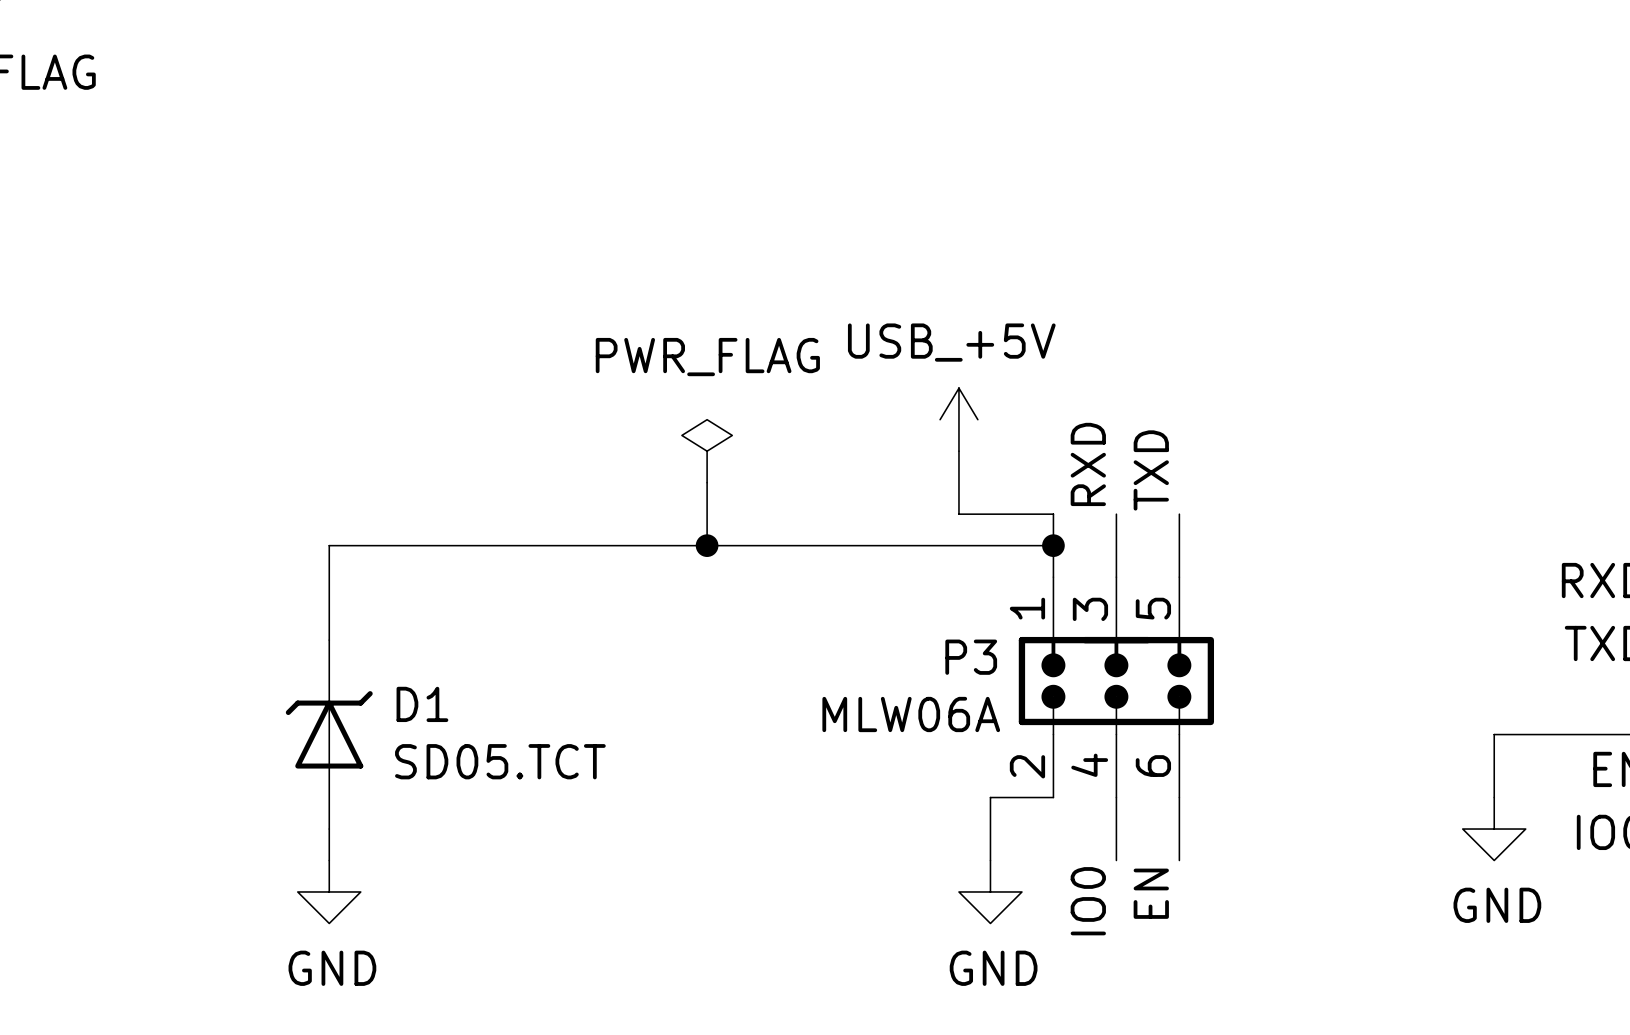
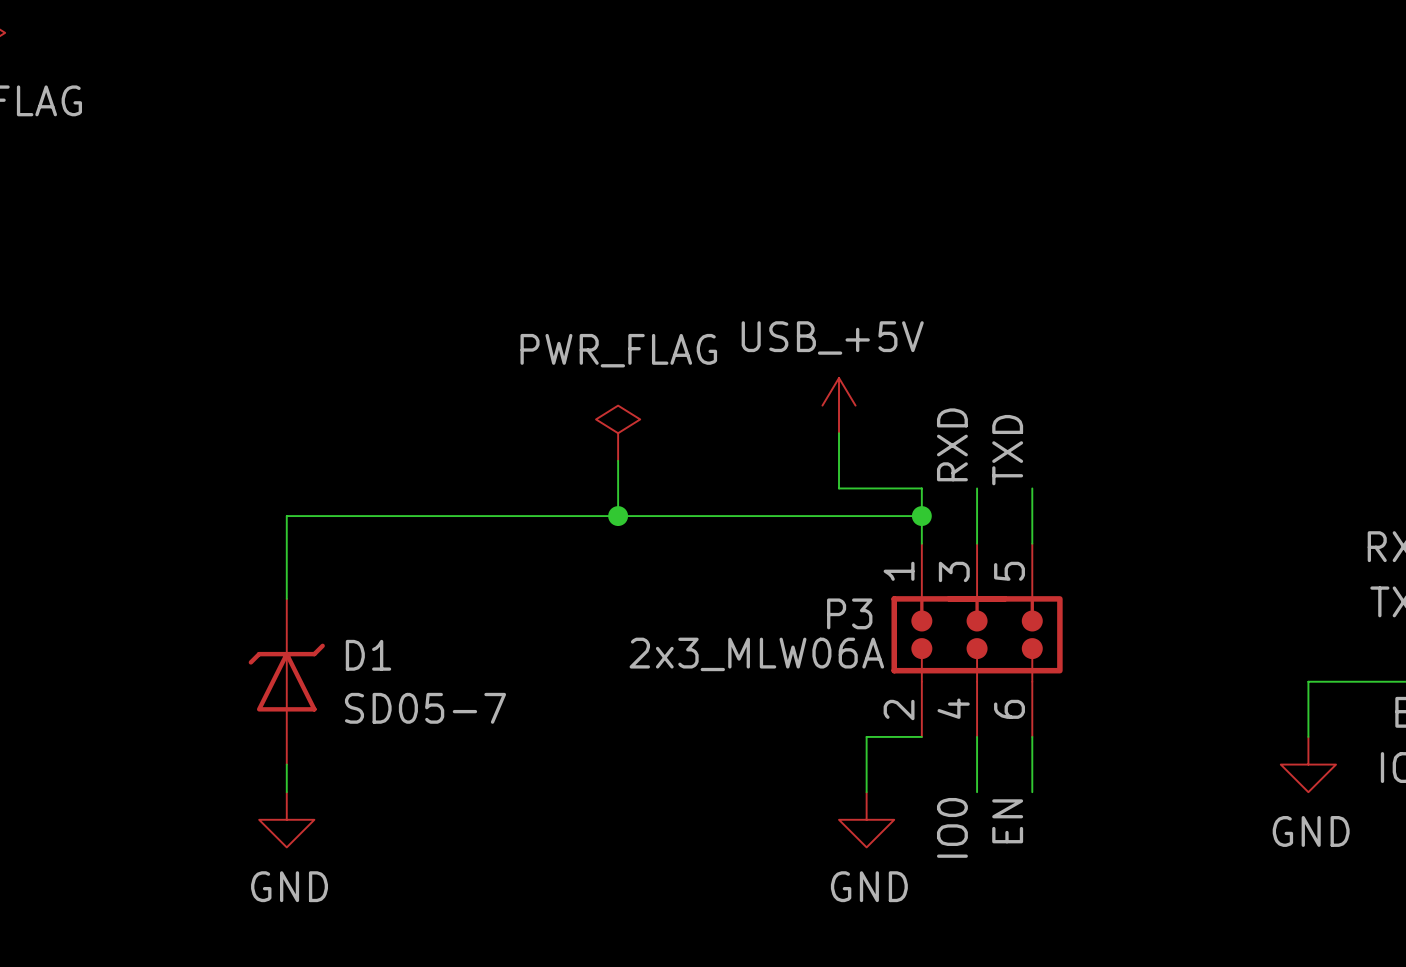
P3 value: MLW06A (911, 714) -> 2x3_MLW06A (756, 654)
D1 value: SD05.TCT (500, 761) -> SD05-7 (425, 708)

